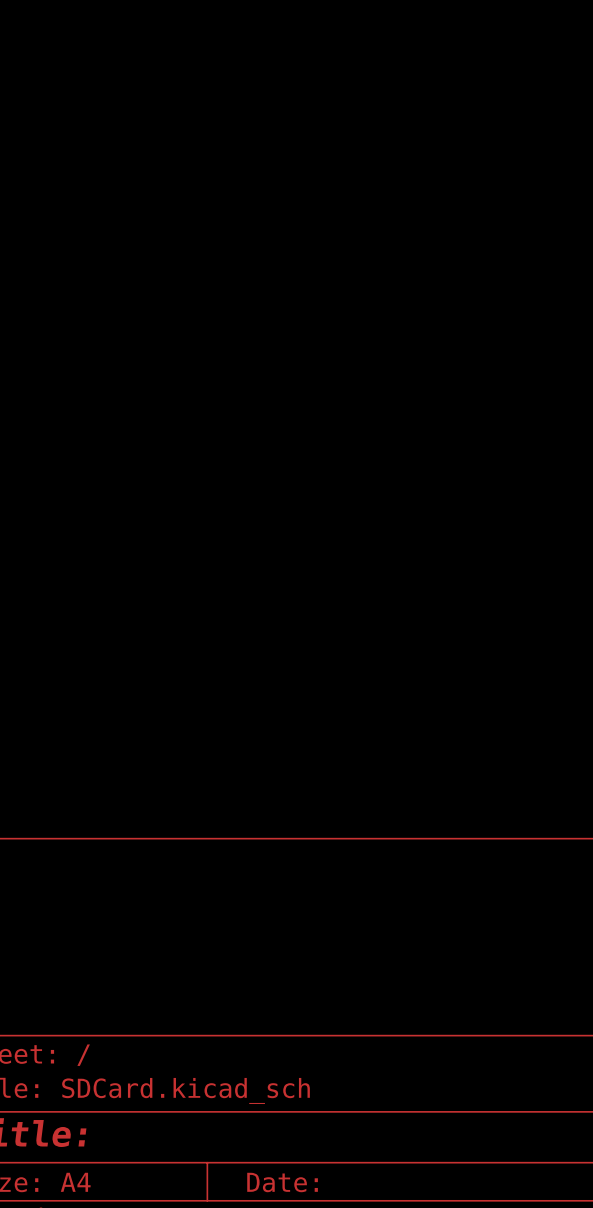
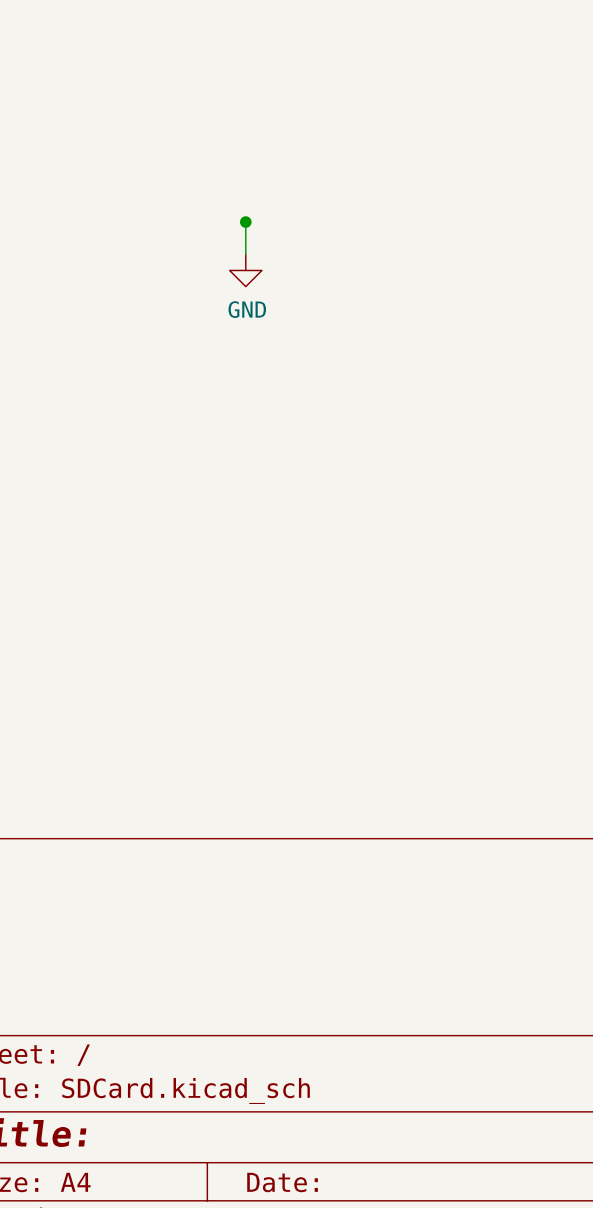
wire: none -> (245, 222) (245, 254)
junction: none -> (245, 222)
power symbol: none -> GND (245, 270)

